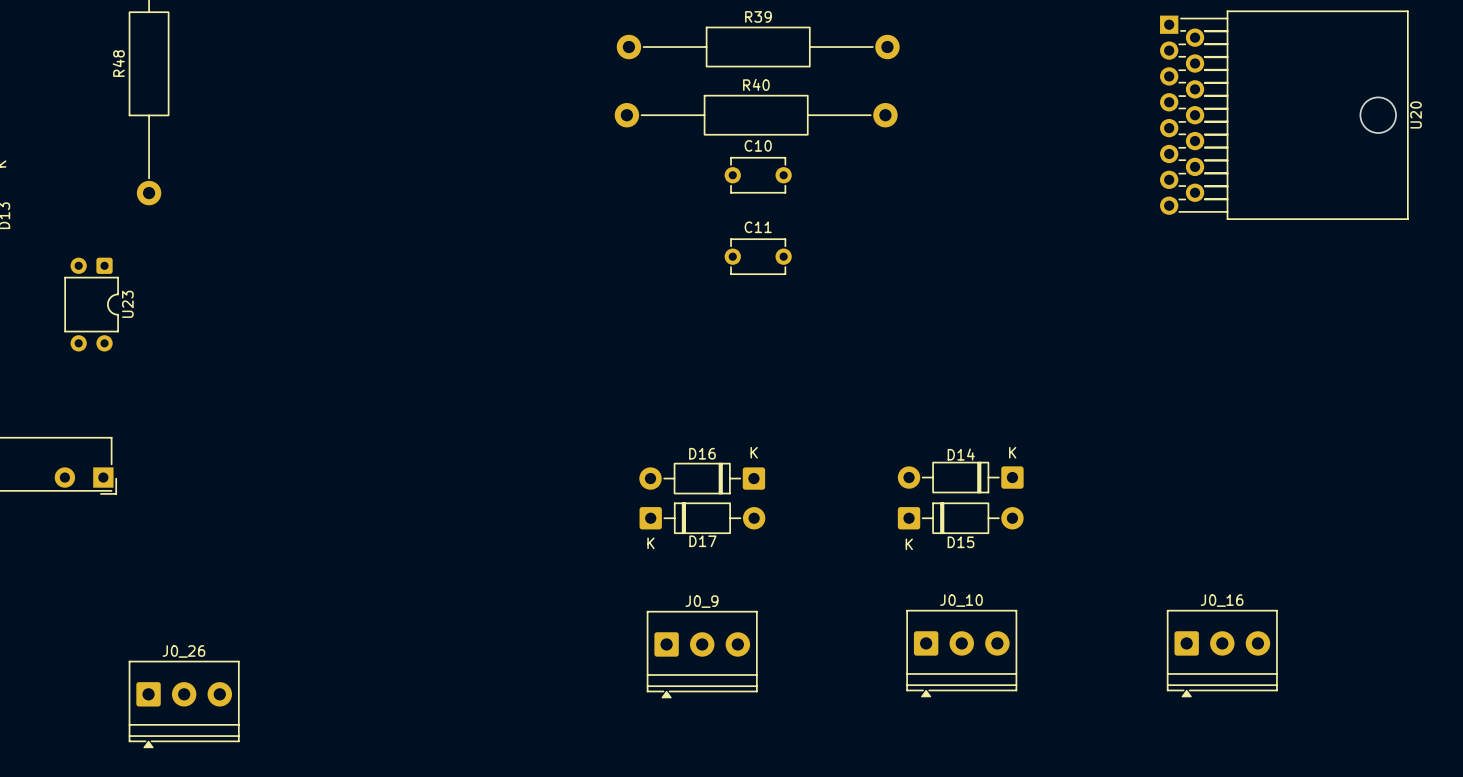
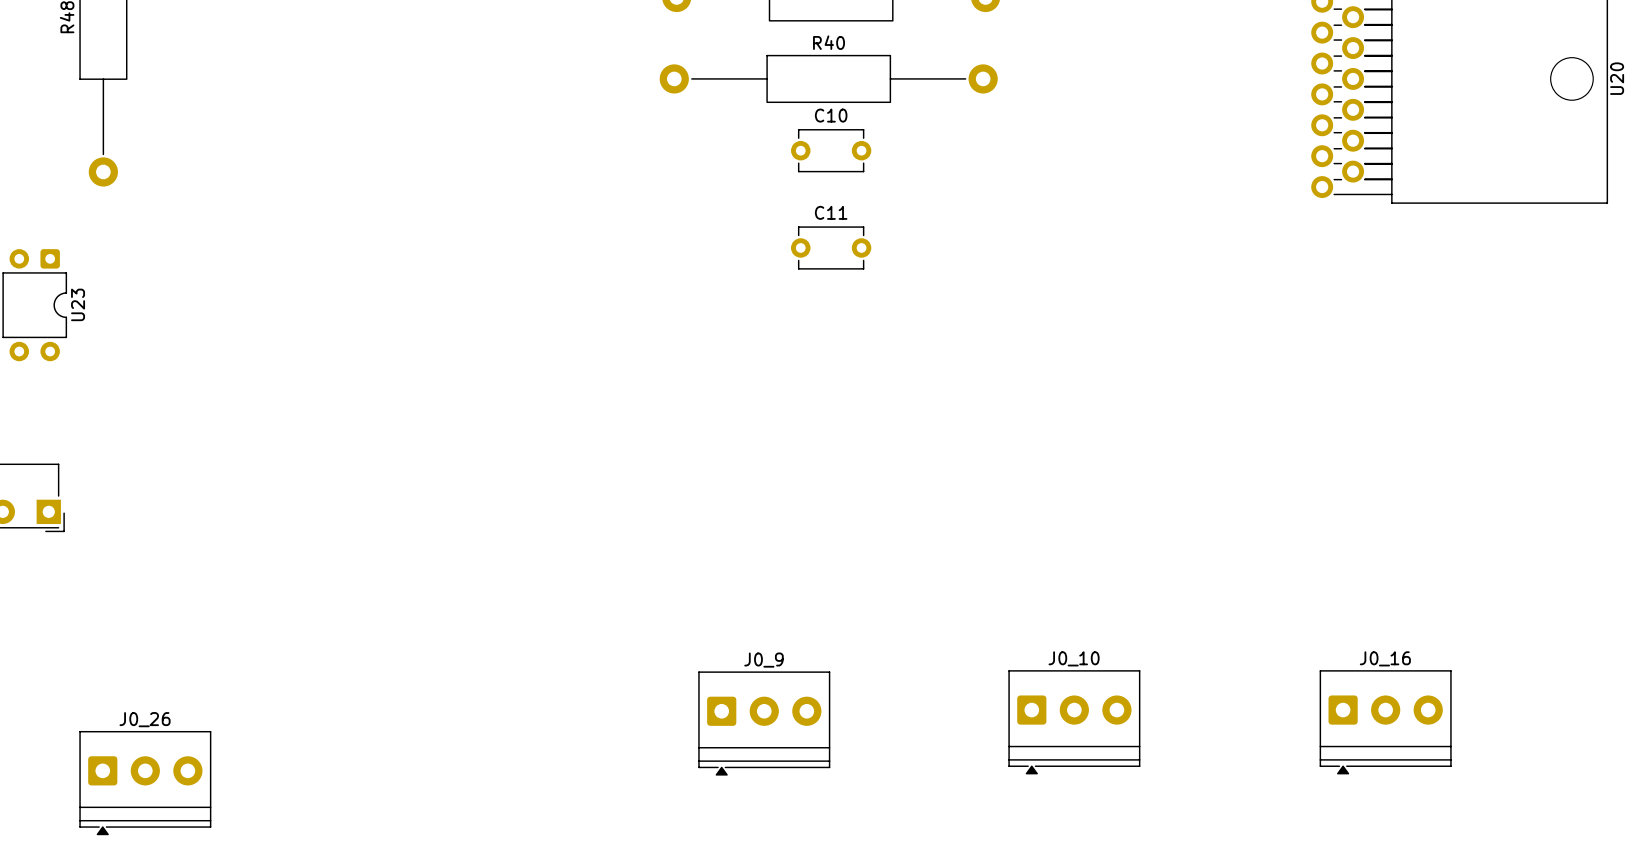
D14: (960, 477) -> none
D16: (702, 478) -> none
D17: (702, 518) -> none
D15: (960, 518) -> none

